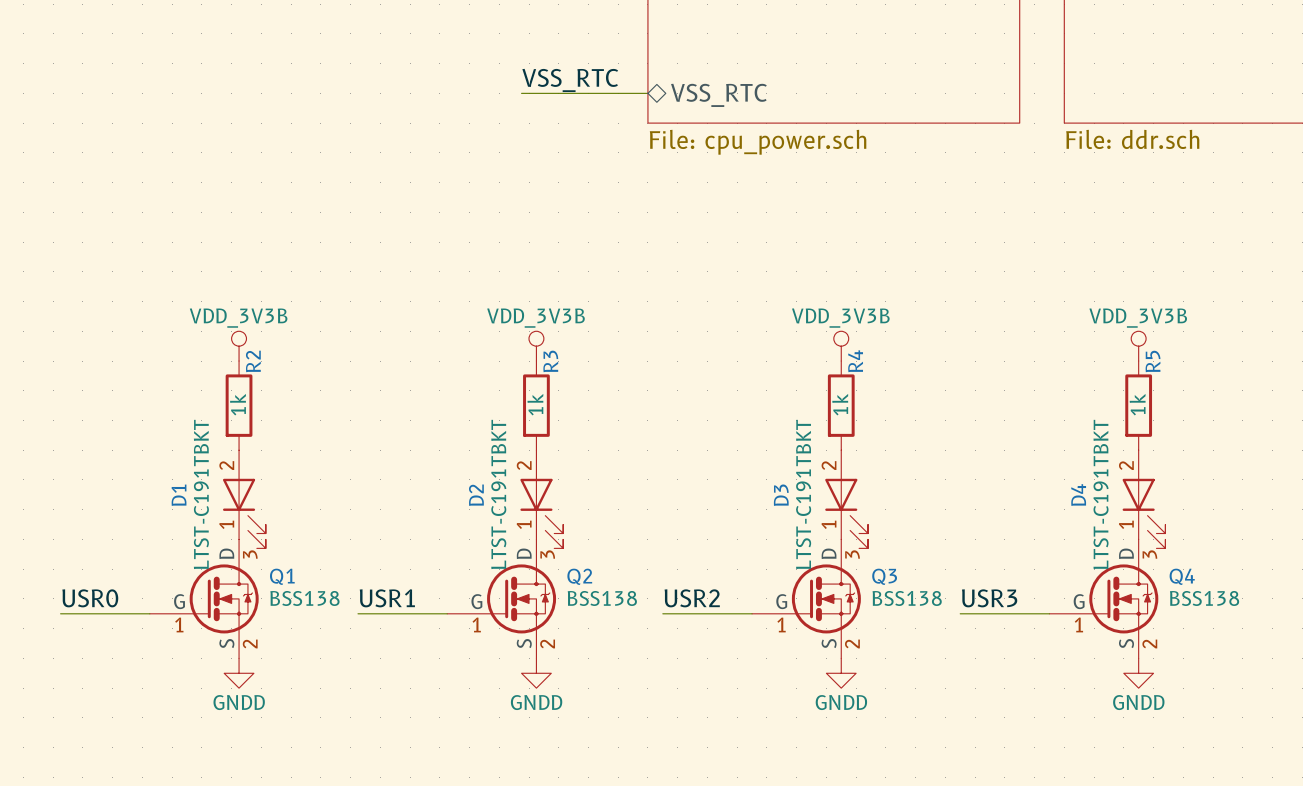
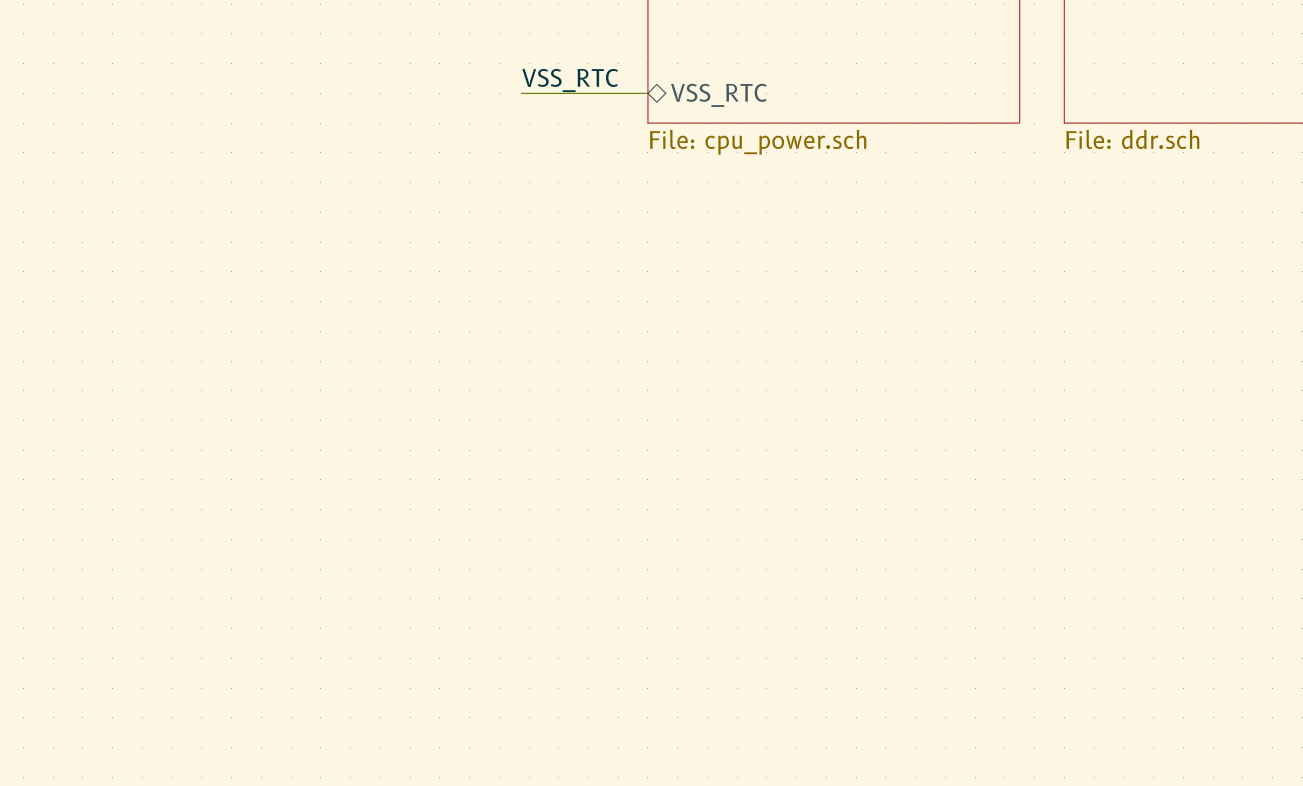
power symbol: VDD_3V3B (239, 346) -> none
power symbol: VDD_3V3B (536, 346) -> none
power symbol: VDD_3V3B (841, 346) -> none
power symbol: VDD_3V3B (1138, 346) -> none
R2: 1k (239, 405) -> none
R3: 1k (536, 405) -> none
R4: 1k (841, 405) -> none
R5: 1k (1138, 405) -> none
D1: LTST-C191TBKT (244, 499) -> none
D2: LTST-C191TBKT (541, 499) -> none
D3: LTST-C191TBKT (846, 499) -> none
D4: LTST-C191TBKT (1144, 499) -> none
label: USR0 (90, 598) -> none
Q1: BSS138 (204, 598) -> none
label: USR1 (387, 598) -> none
Q2: BSS138 (501, 598) -> none
label: USR2 (692, 598) -> none
Q3: BSS138 (806, 598) -> none
label: USR3 (989, 598) -> none
Q4: BSS138 (1103, 598) -> none
wire: (60, 613) (149, 613) -> none
wire: (357, 613) (447, 613) -> none
wire: (662, 613) (752, 613) -> none
wire: (960, 613) (1049, 613) -> none
power symbol: GNDD (239, 673) -> none
power symbol: GNDD (536, 673) -> none
power symbol: GNDD (841, 673) -> none
power symbol: GNDD (1138, 673) -> none

